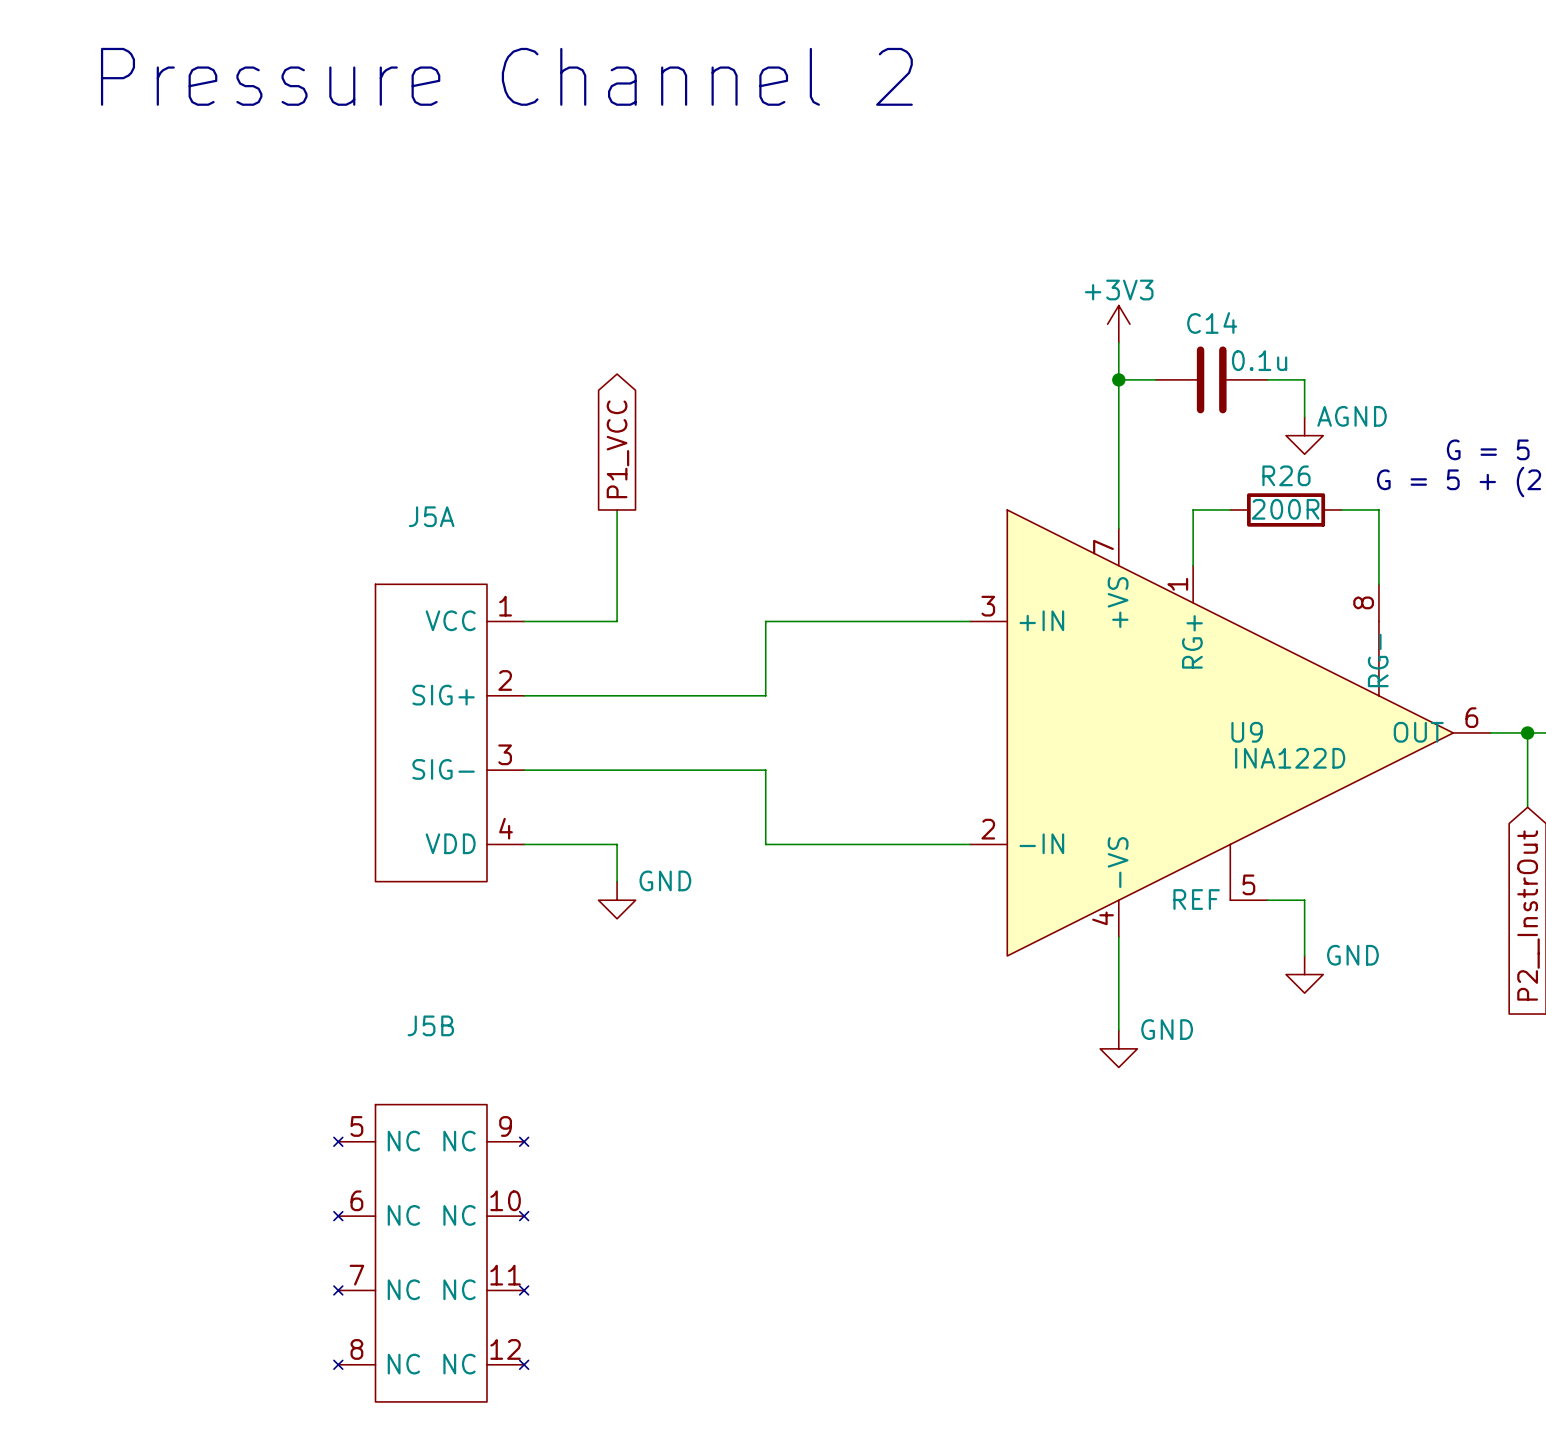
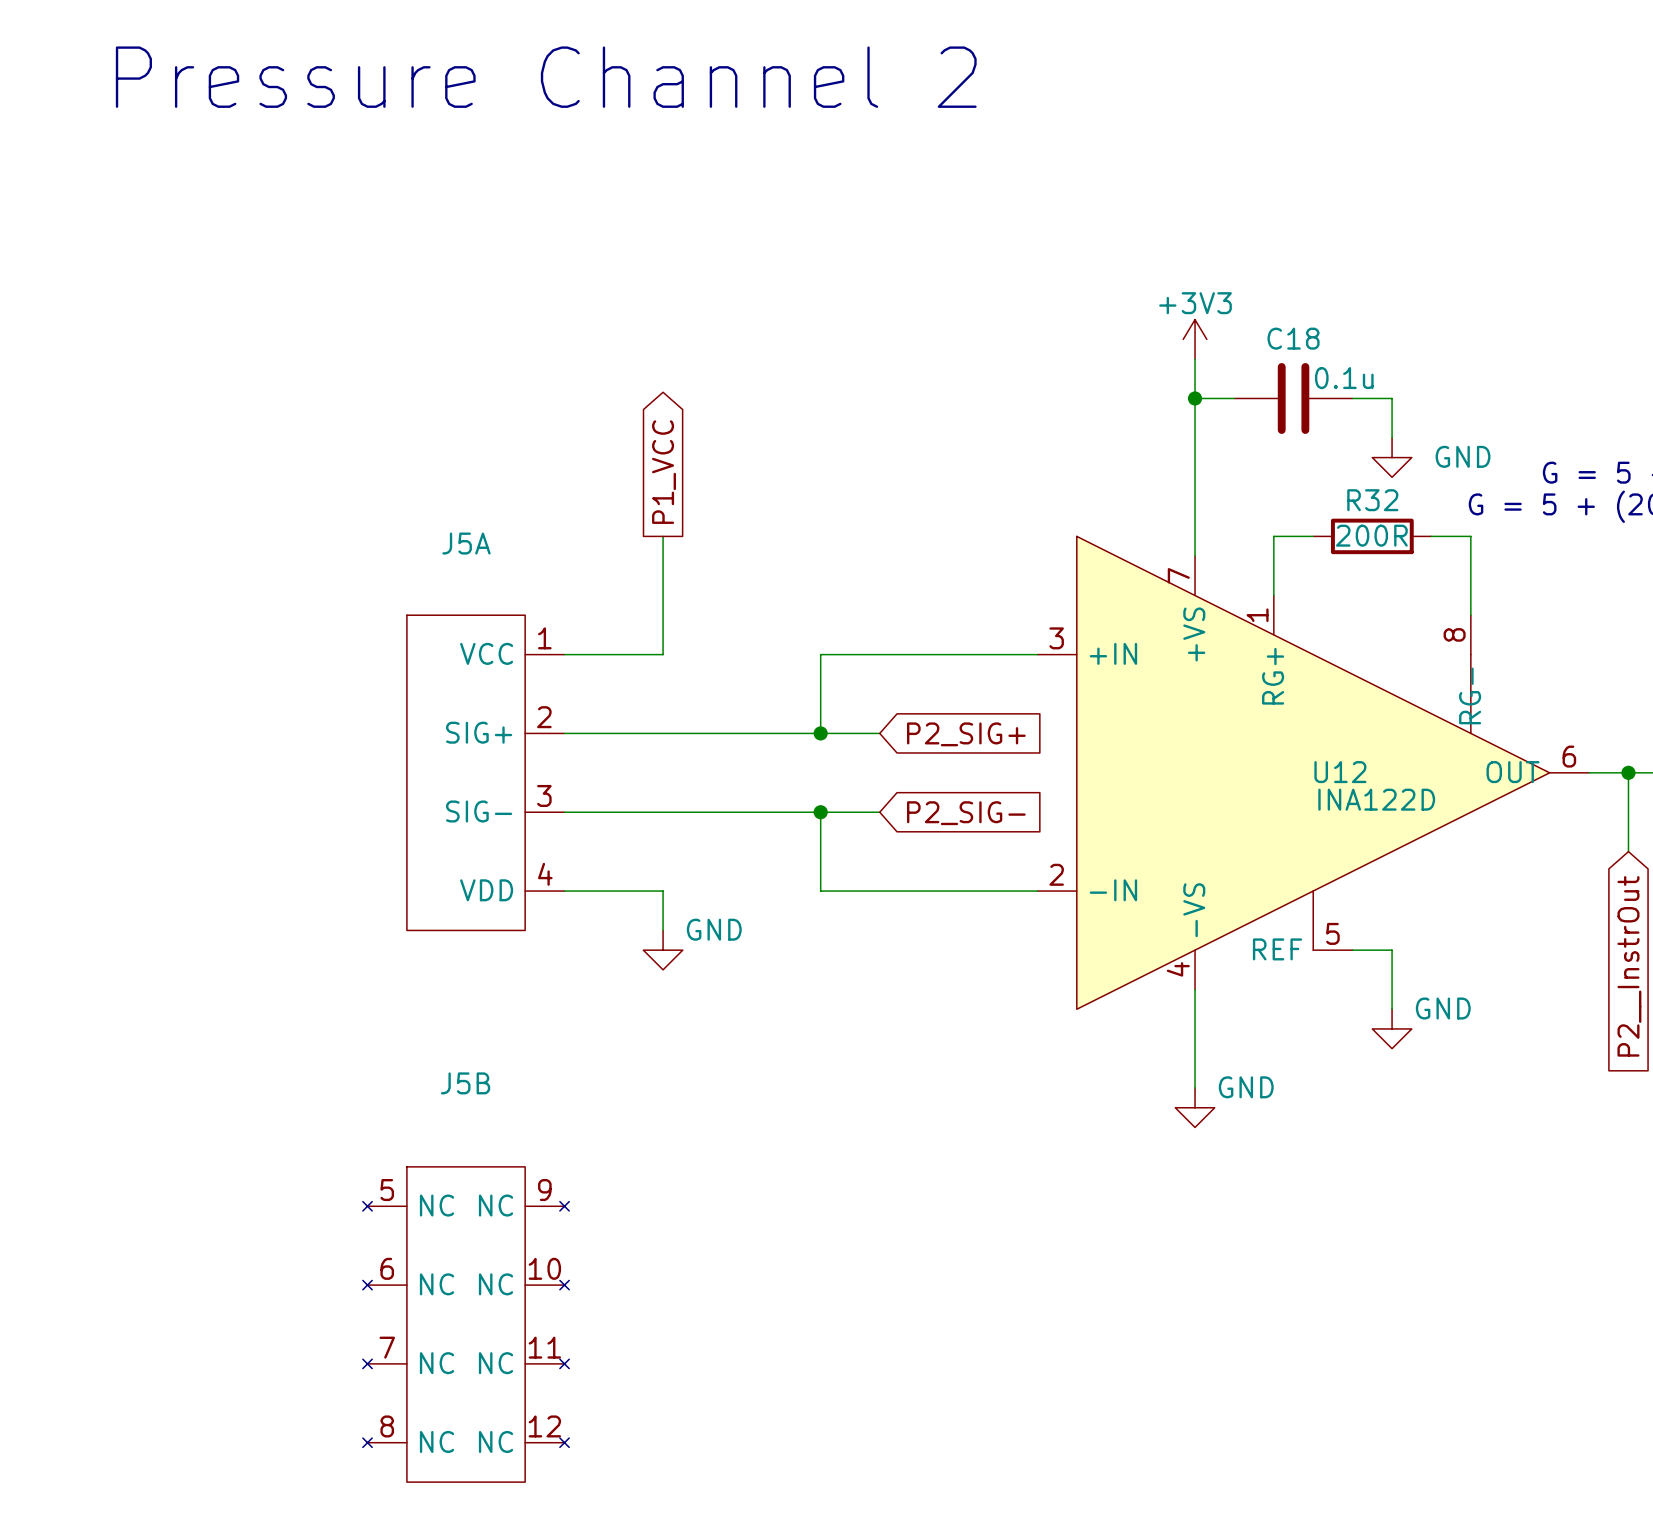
C14 name: C14 (1212, 323) -> C18 (1293, 338)
power symbol: AGND (1304, 435) -> GND (1392, 457)
R26 name: R26 (1286, 475) -> R32 (1372, 500)
wire: none -> (820, 733) (879, 733)
junction: none -> (820, 733)
global label: none -> P2_SIG+ (966, 734)
U9 name: U9 (1247, 732) -> U12 (1340, 772)
wire: none -> (820, 812) (879, 812)
junction: none -> (820, 812)
global label: none -> P2_SIG- (966, 813)

